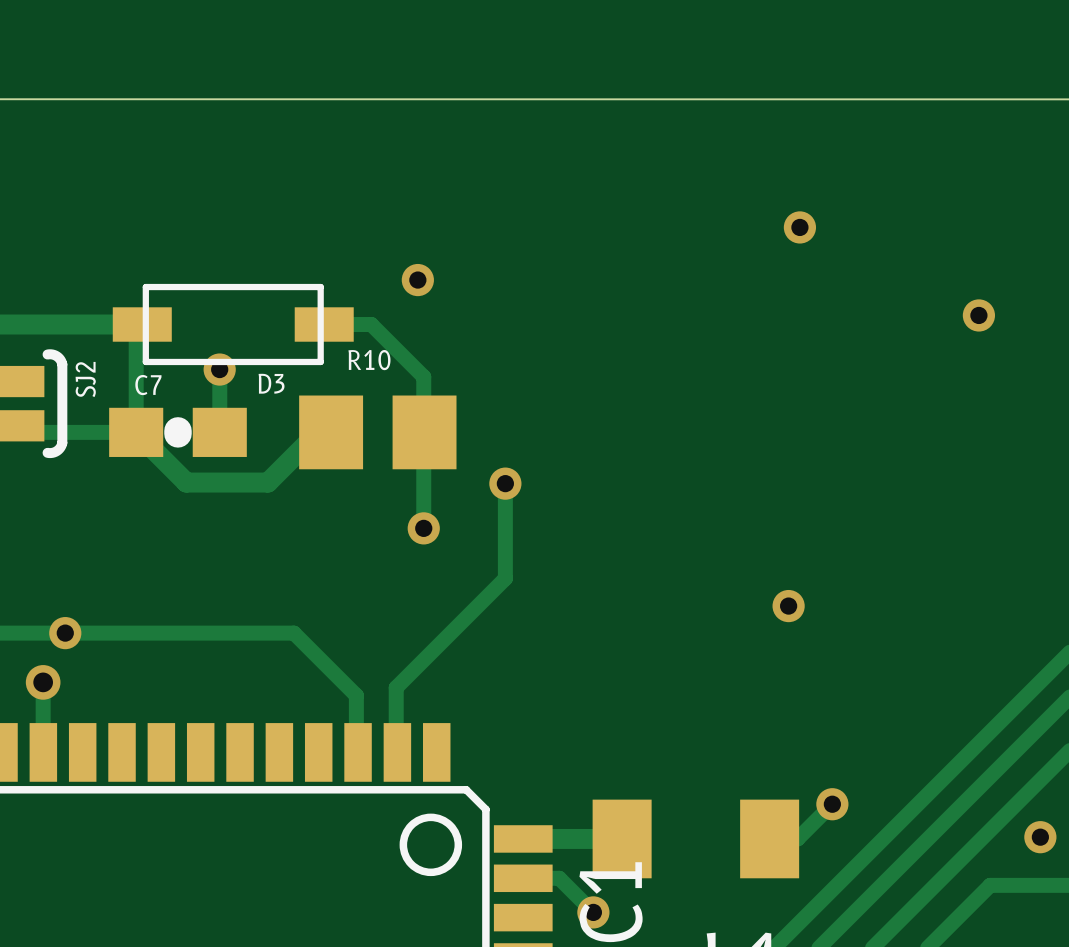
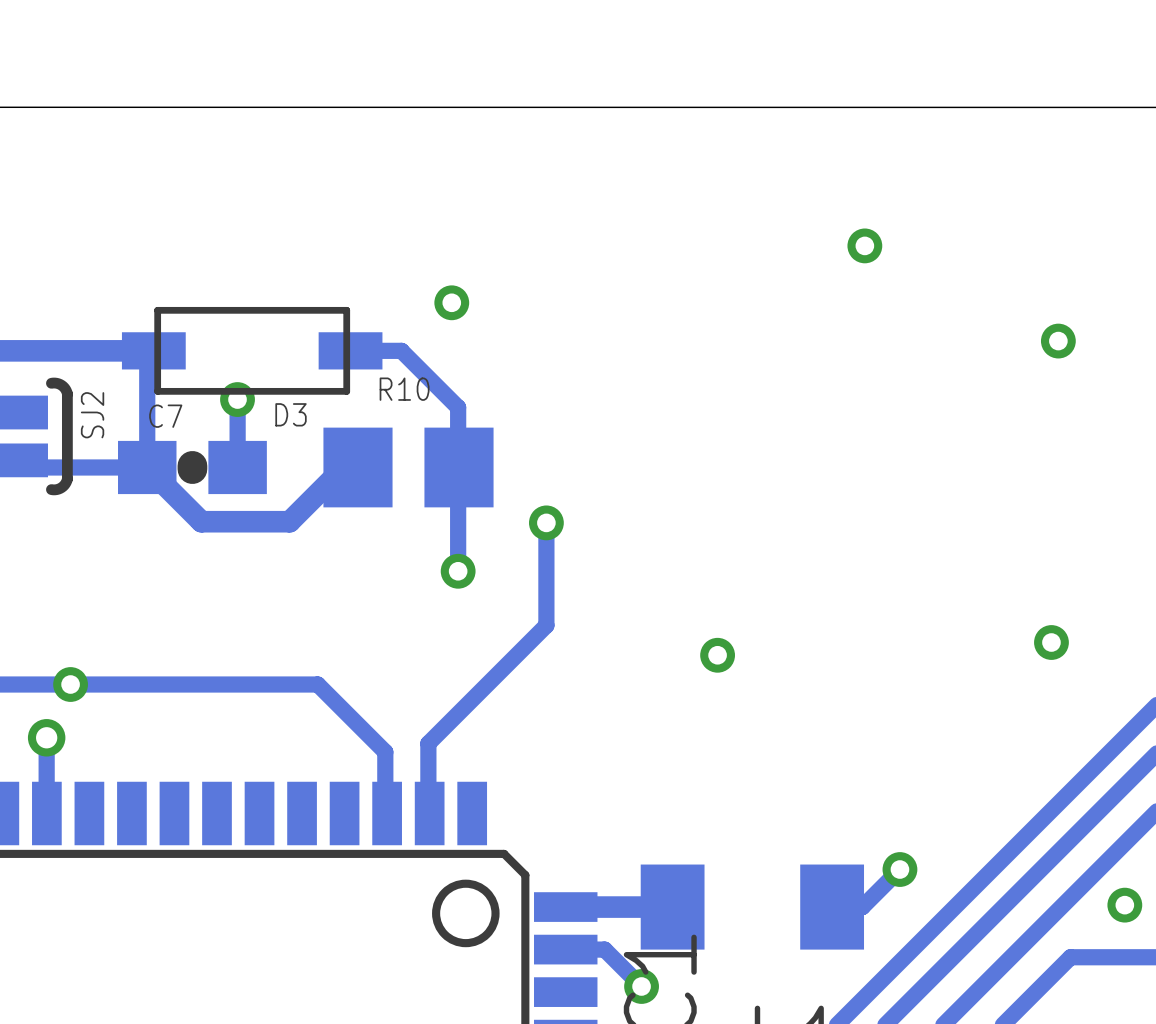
via: none -> (1051, 642)
via: none -> (717, 655)
via: (788, 606) -> none

